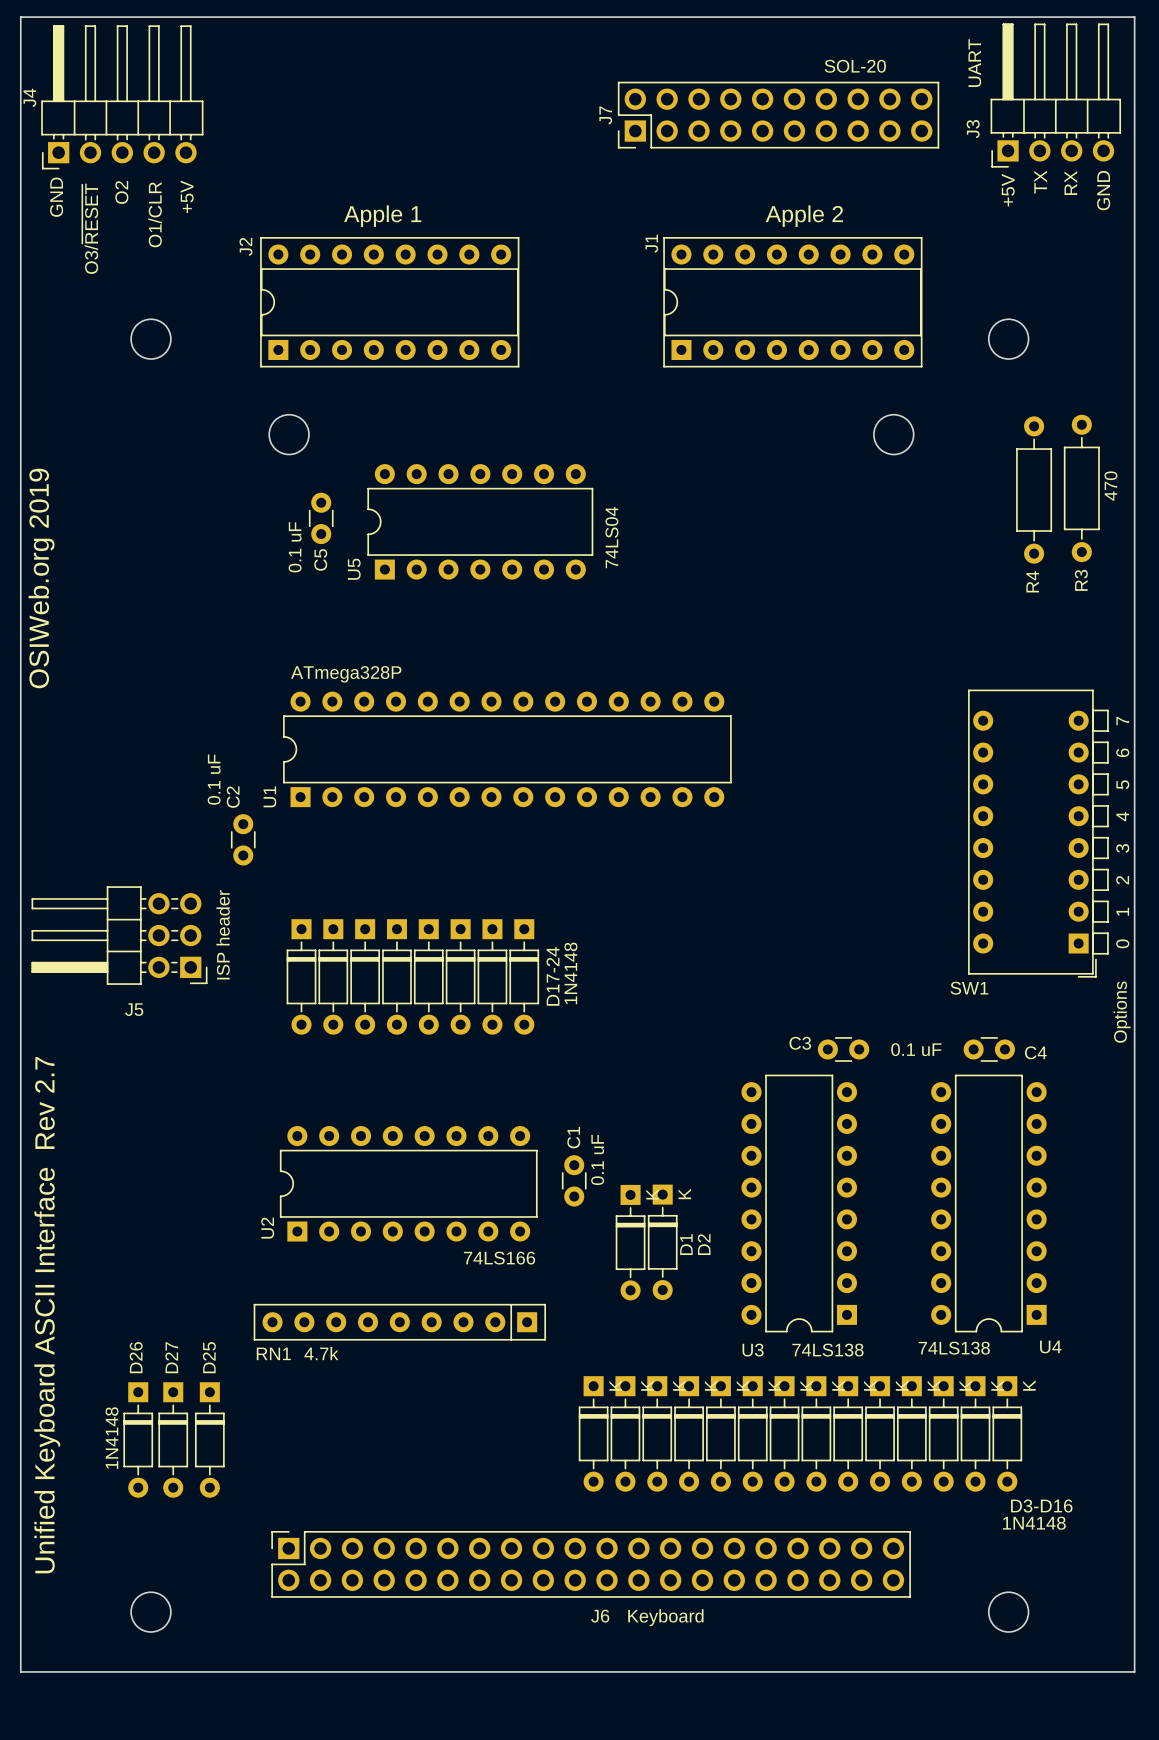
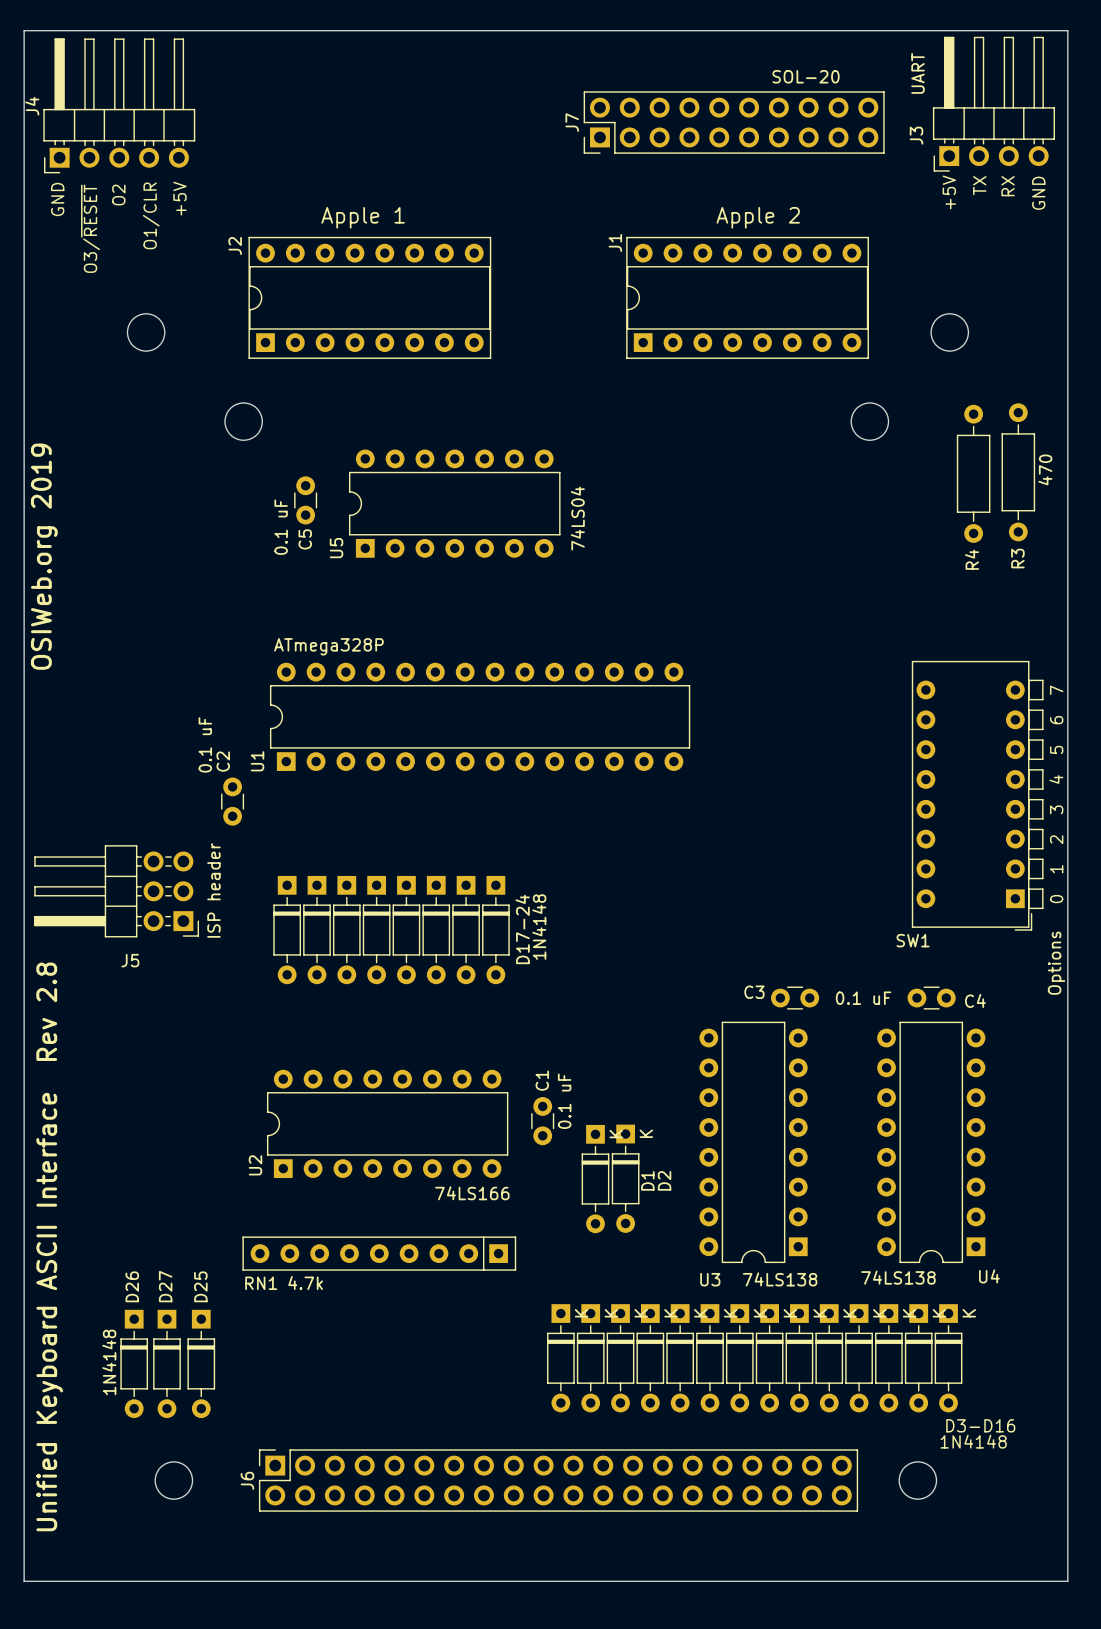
round board edge: [268, 414, 310, 456] -> none
round board edge: [873, 414, 915, 456] -> none
text: Unified Keyboard ASCII Interface Rev 2.7 (47, 1315) -> Unified Keyboard ASCII Interface Rev 2.8 (49, 1246)
J6 footprint: [271, 1531, 911, 1598] -> [155, 402, 937, 1512]
round board edge: [130, 1591, 172, 1633] -> none
round board edge: [988, 1591, 1030, 1633] -> none
J6 name position: J6 (600, 1616) -> J6 (247, 1480)
J6 value: Keyboard (665, 1617) -> none

